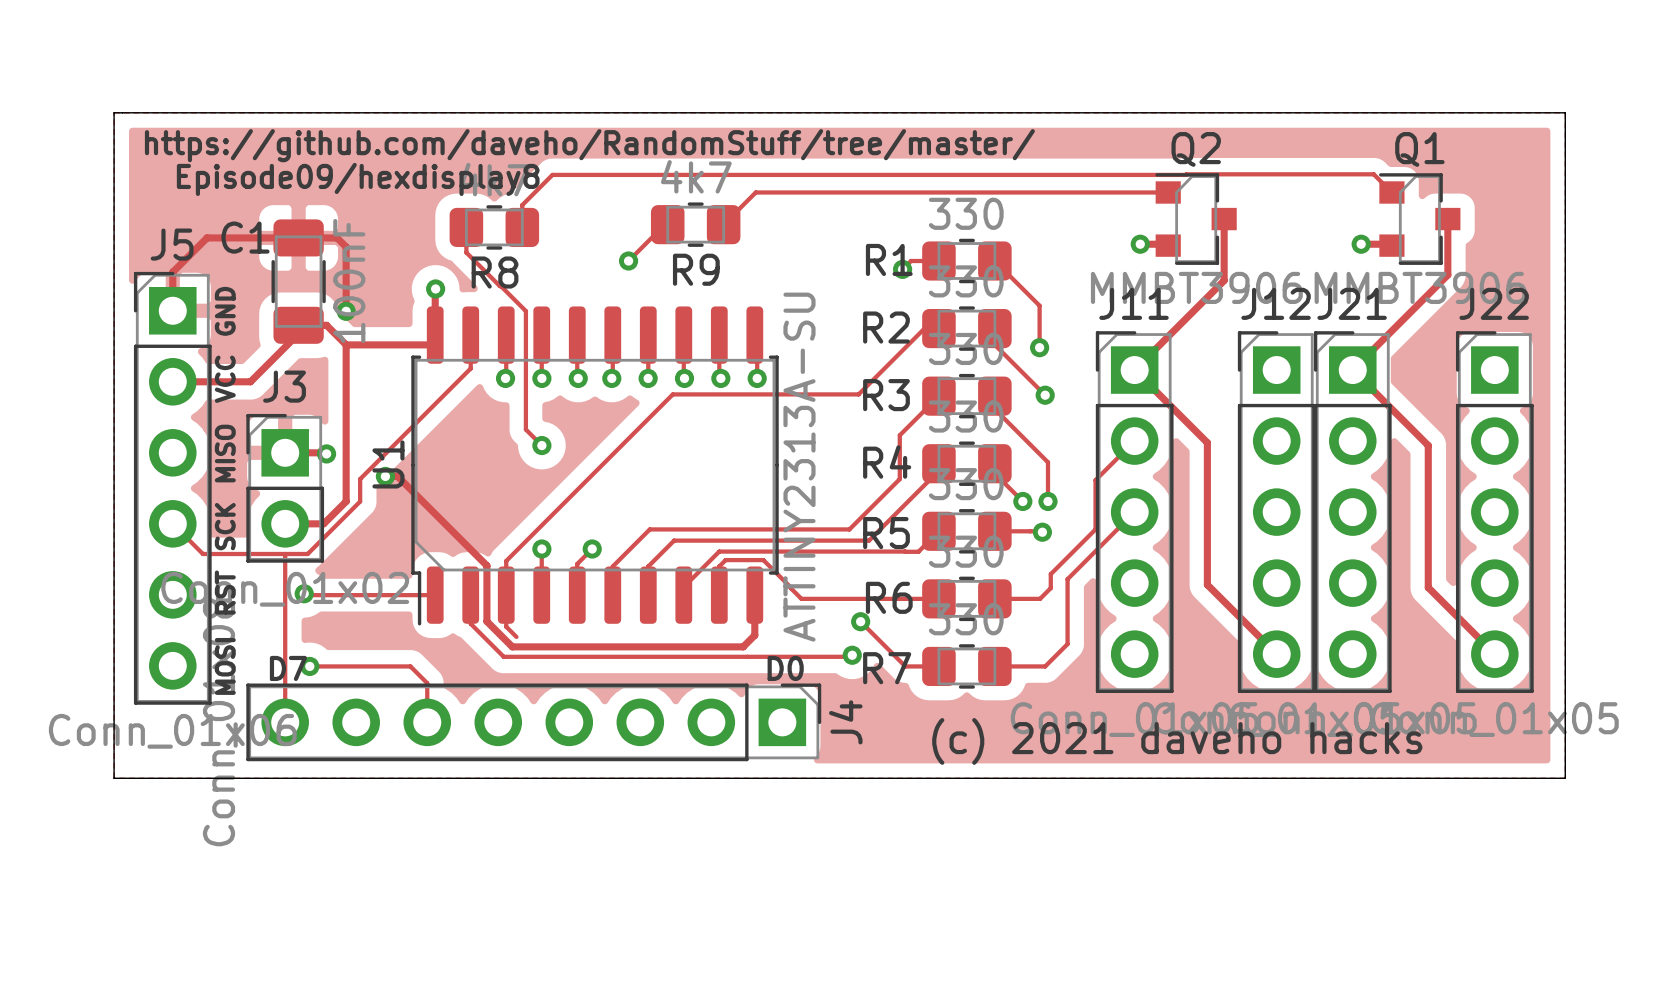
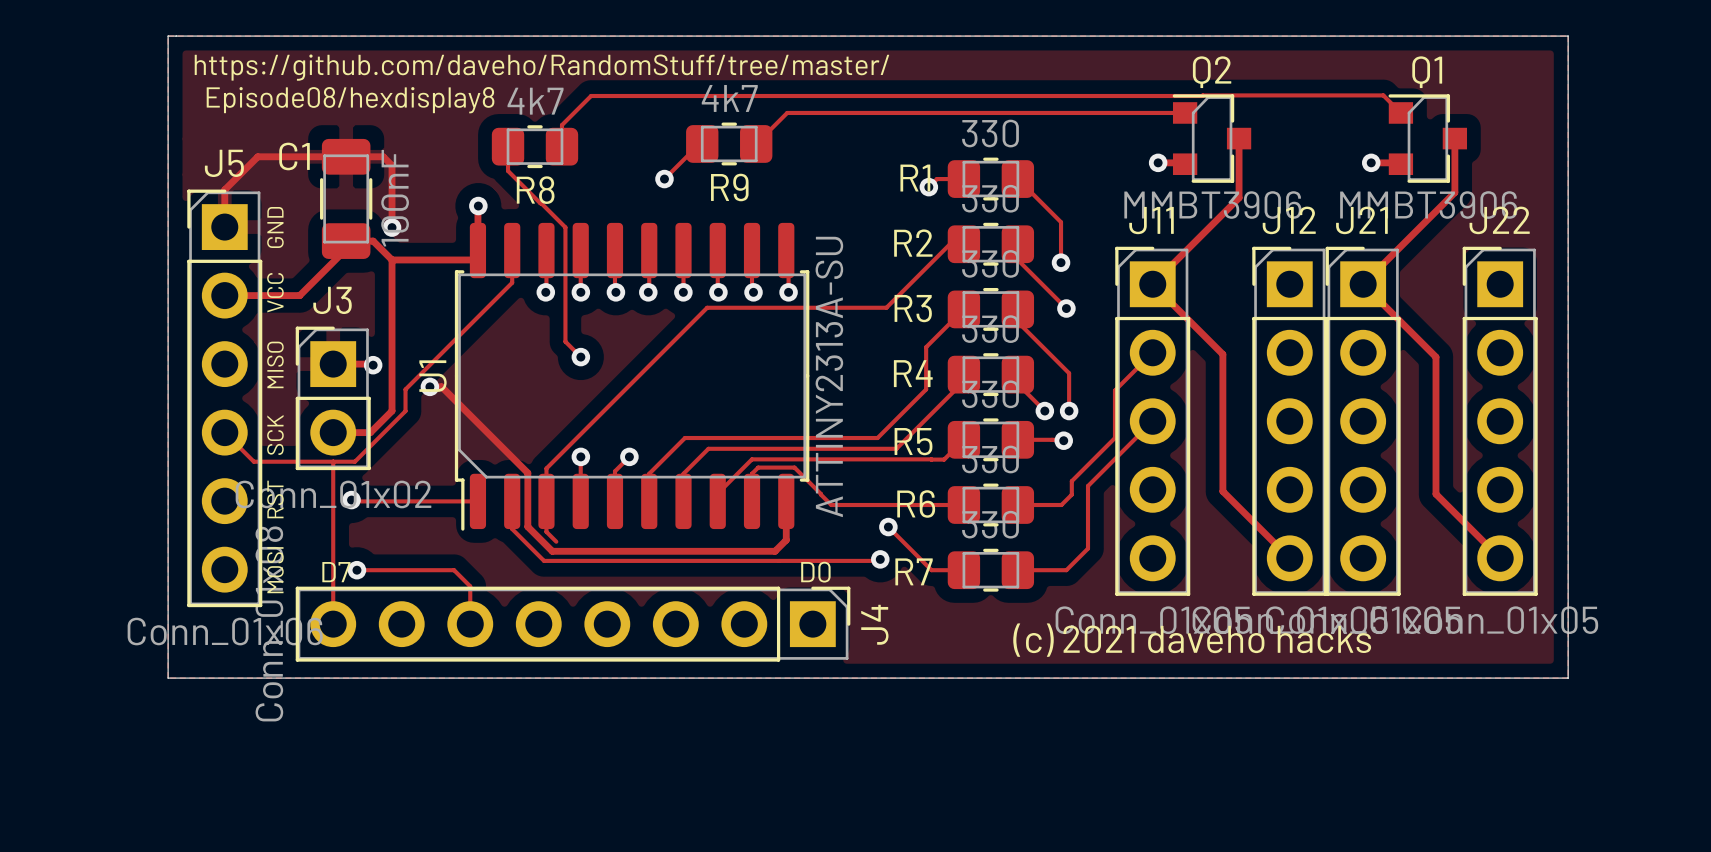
text: Episode09/hexdisplay8 (358, 179) -> Episode08/hexdisplay8 (350, 100)

